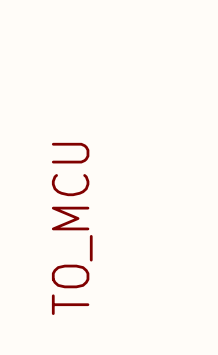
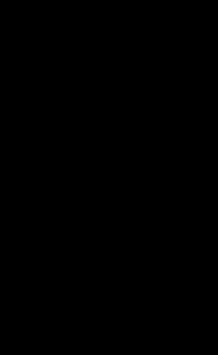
label: TO_MCU (72, 228) -> none

